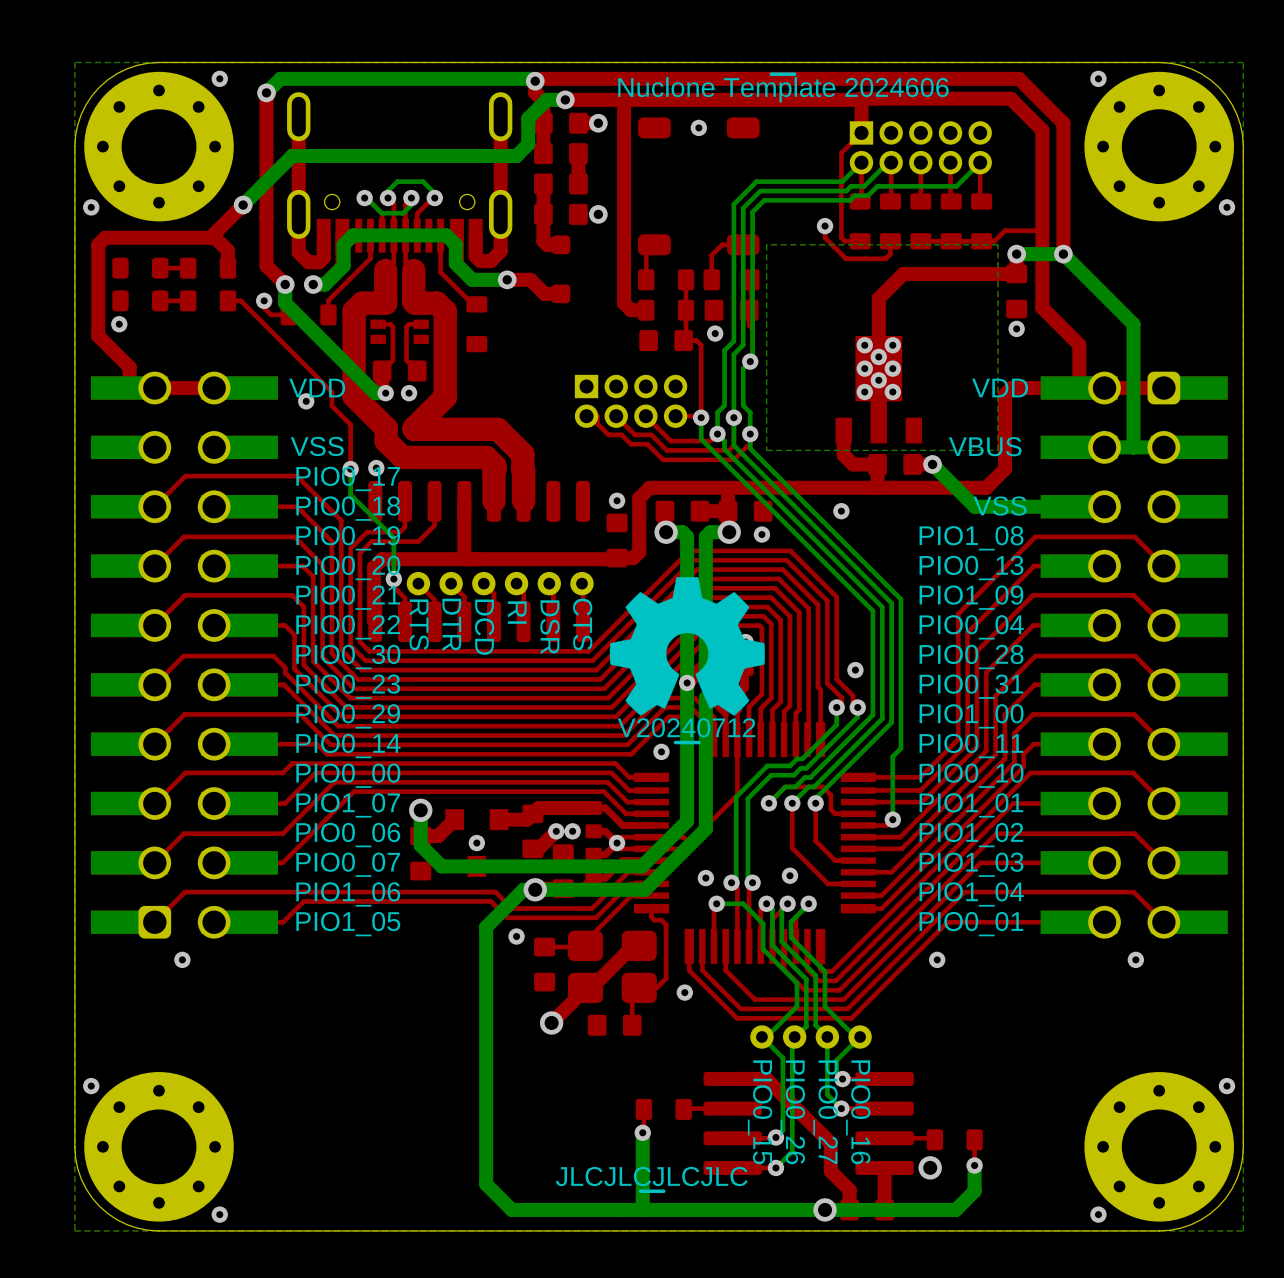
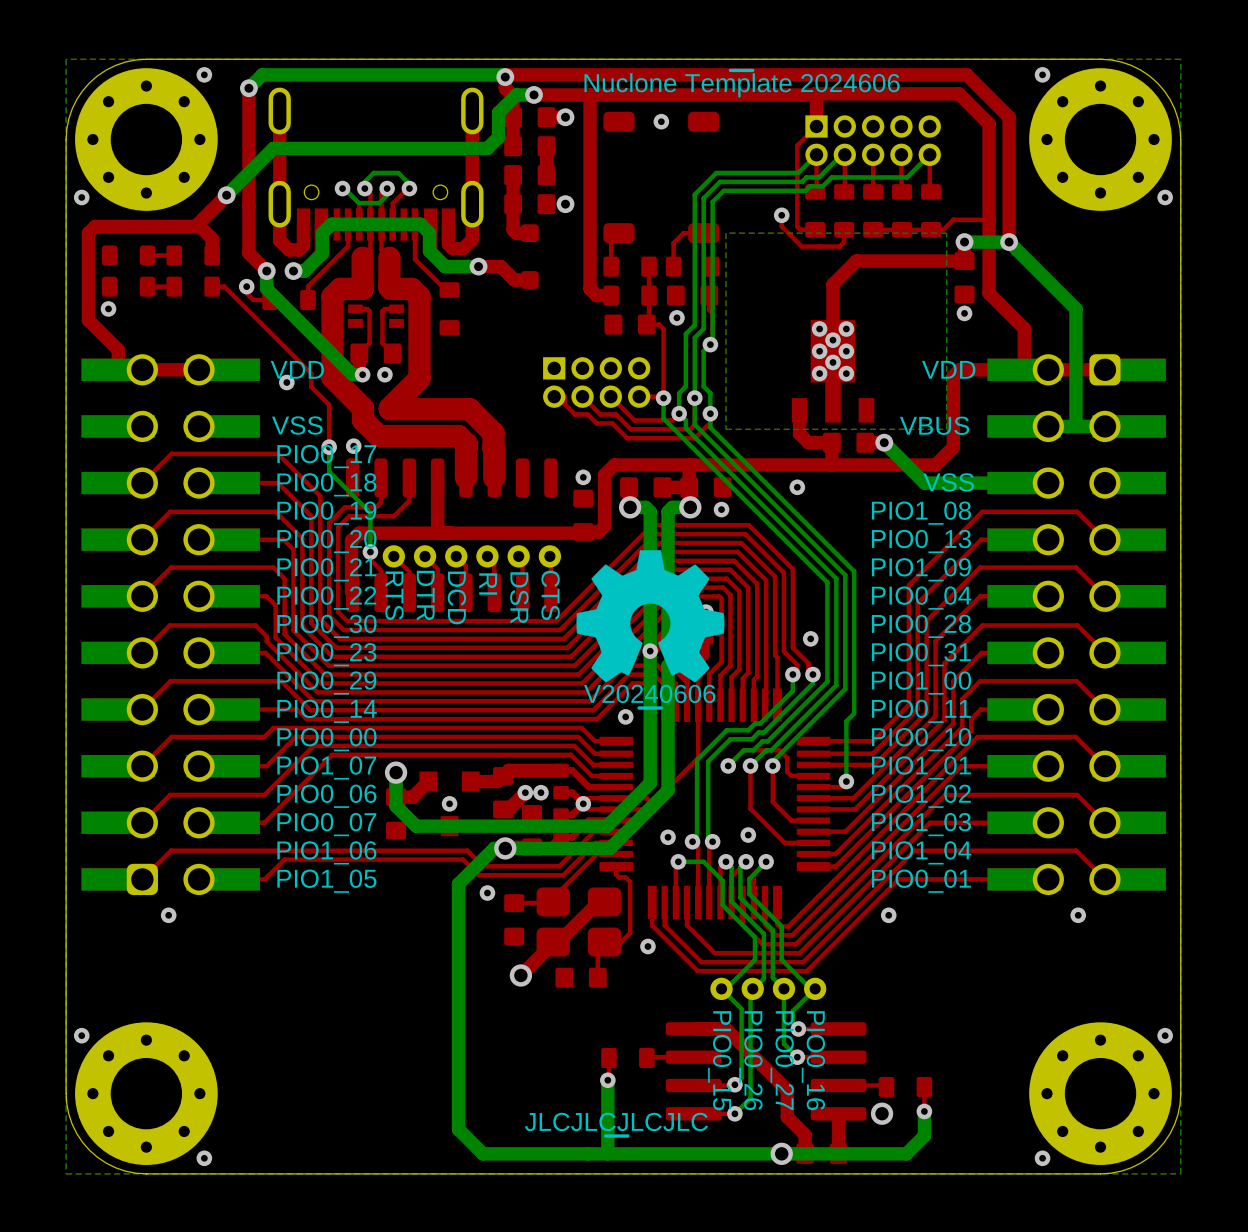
drawing shape: [617, 718, 756, 745] -> [584, 684, 716, 710]

